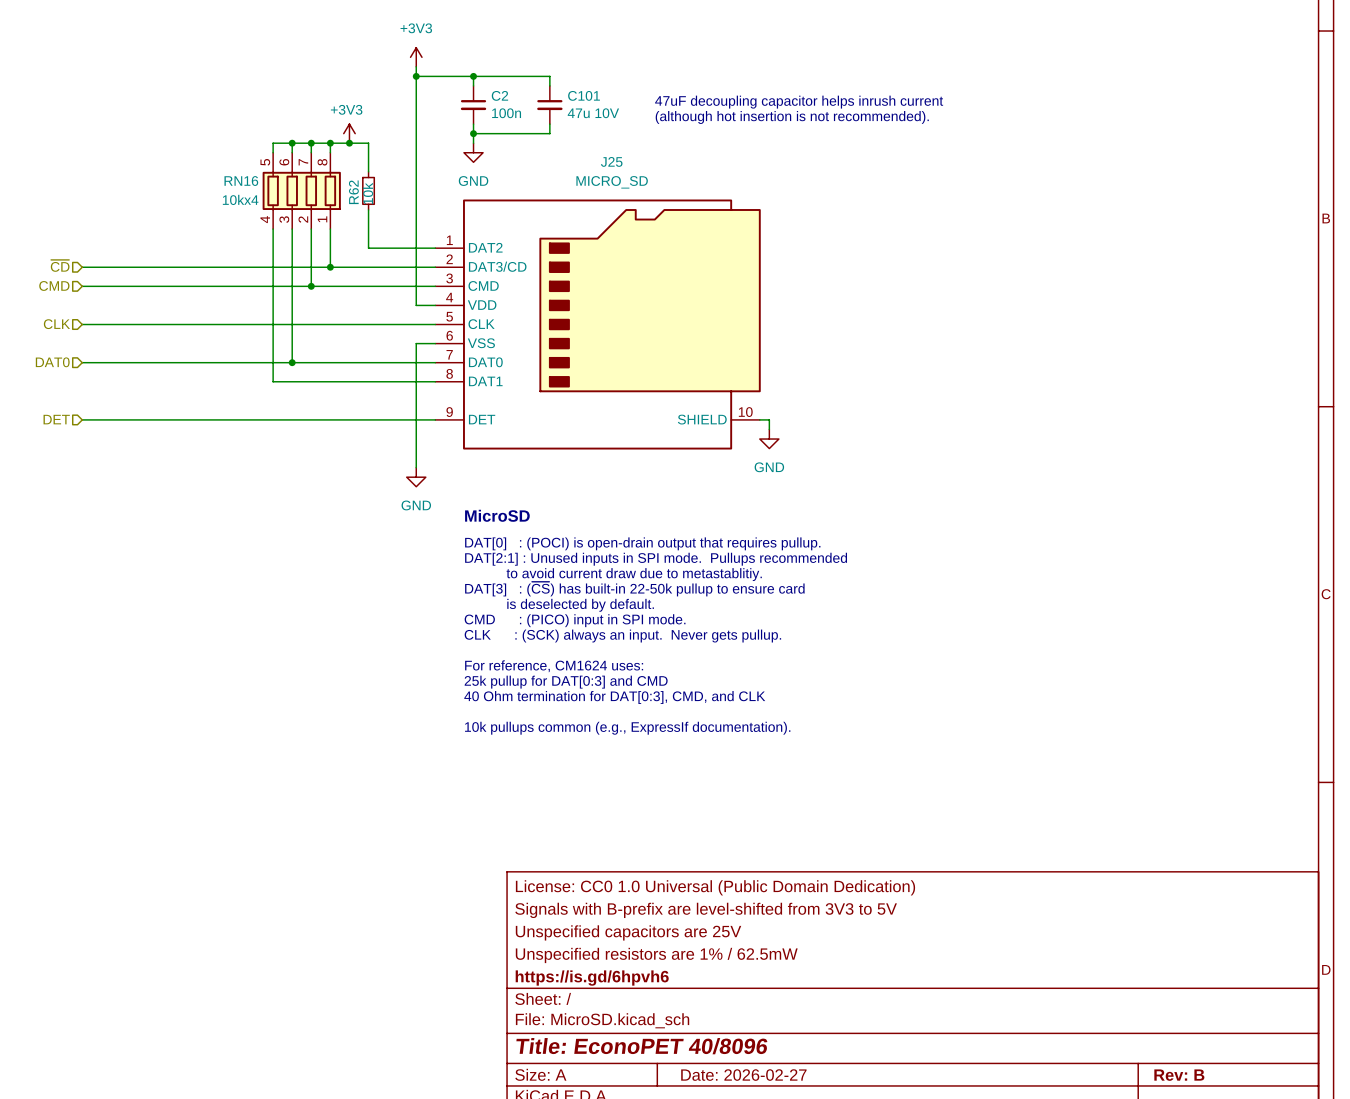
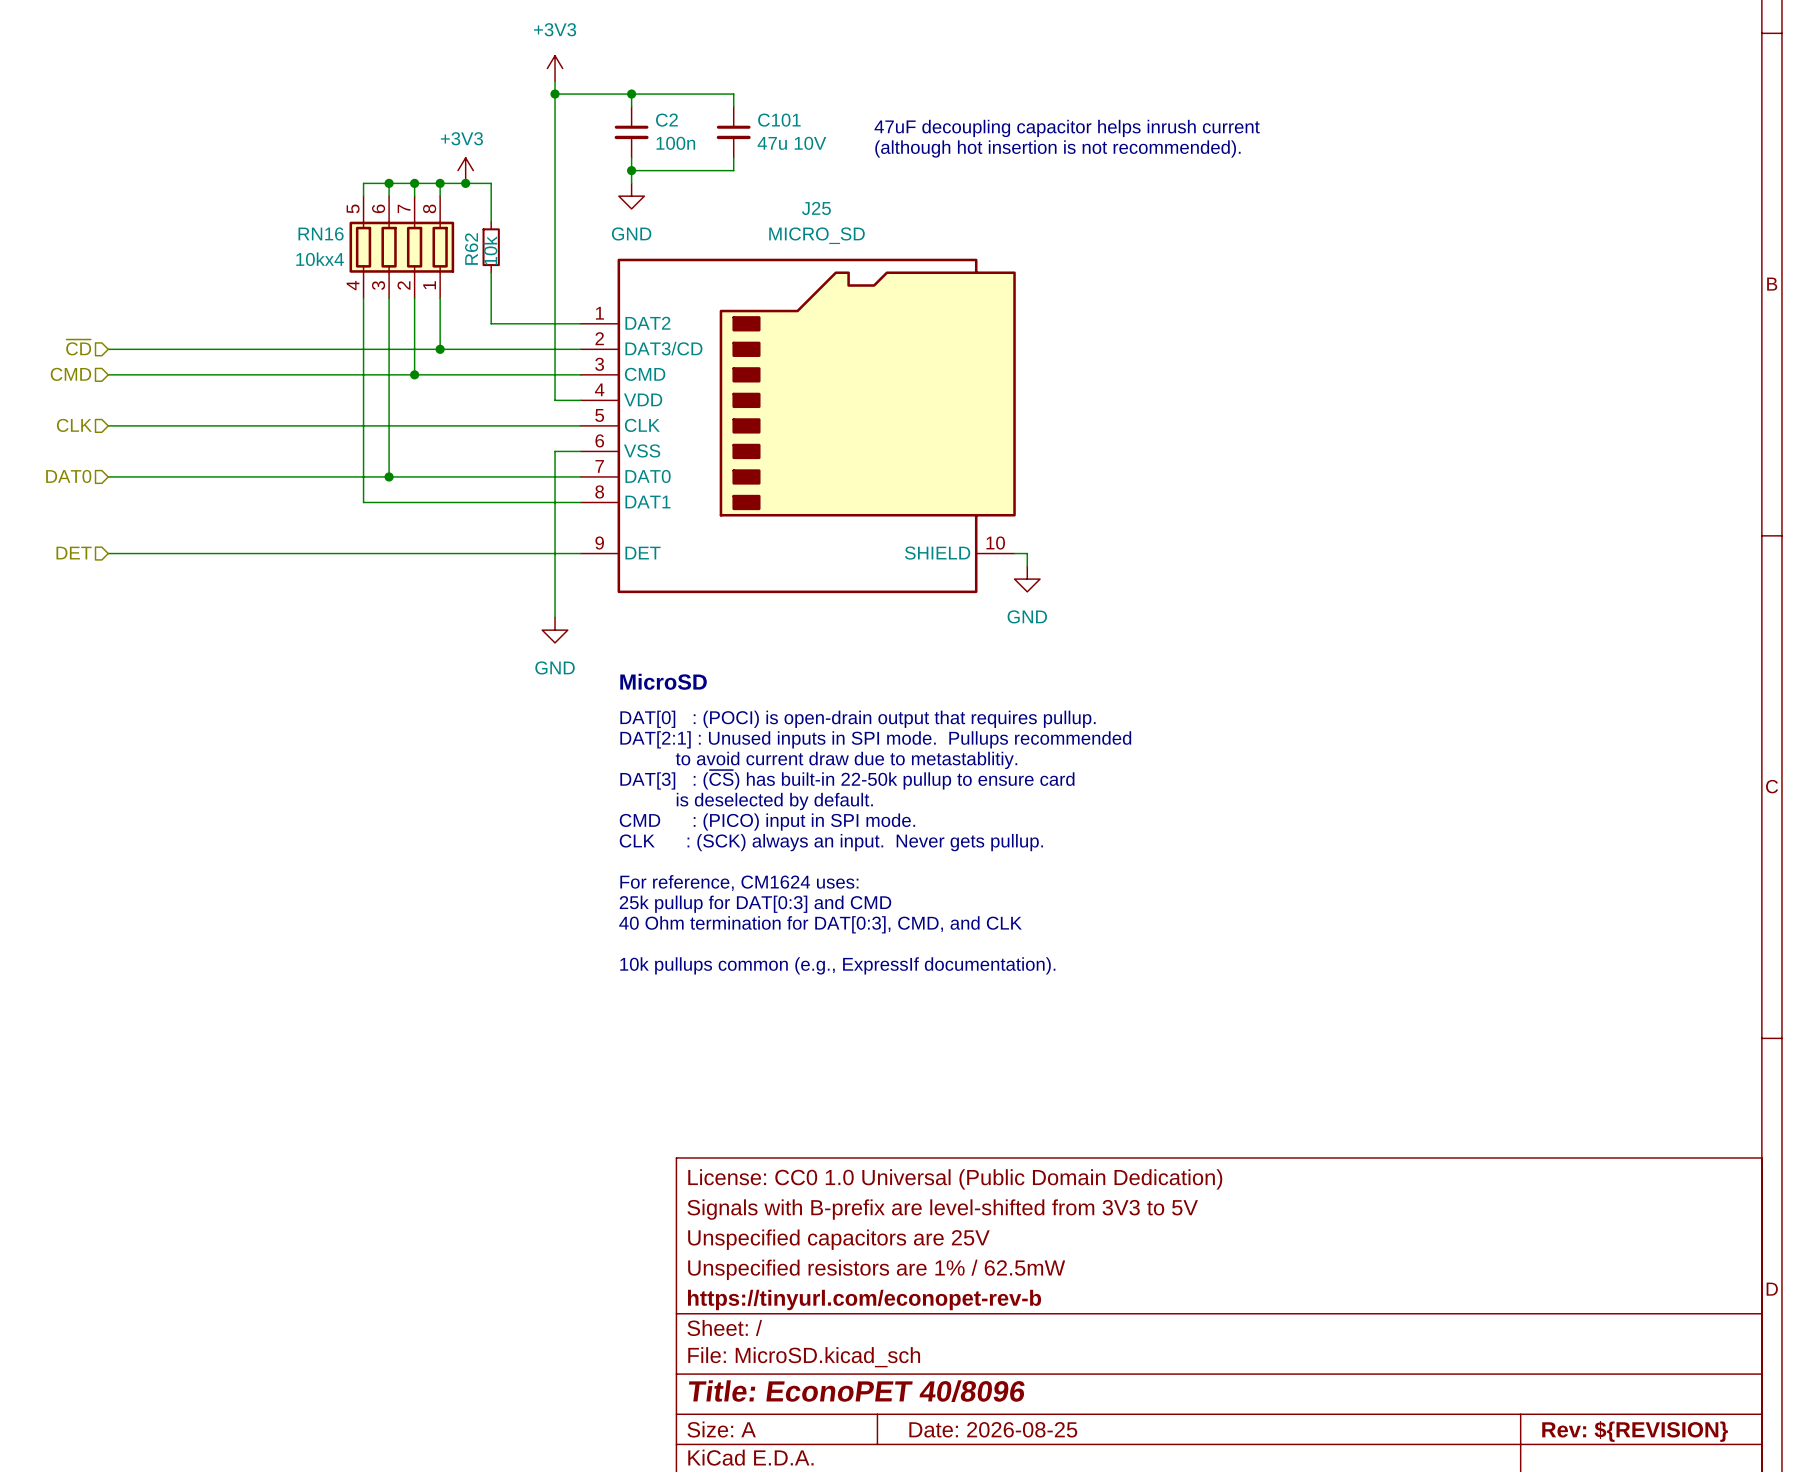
title block: https://is.gd/6hpvh6 (592, 978) -> https://tinyurl.com/econopet-rev-b (864, 1300)
title block: Date: 2026-02-27 (743, 1075) -> Date: 2026-08-25 (993, 1429)
title block: Rev: B (1179, 1075) -> Rev: ${REVISION} (1635, 1431)

